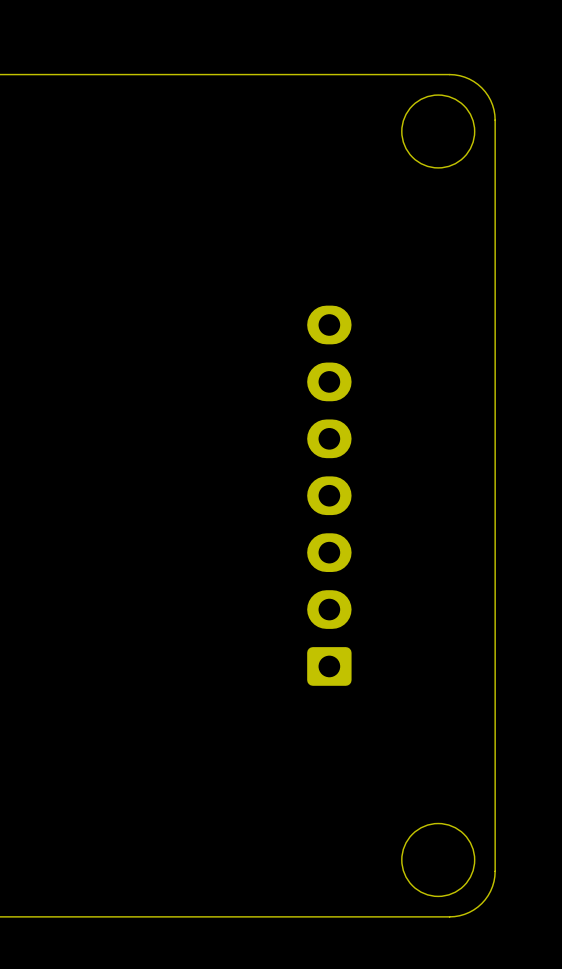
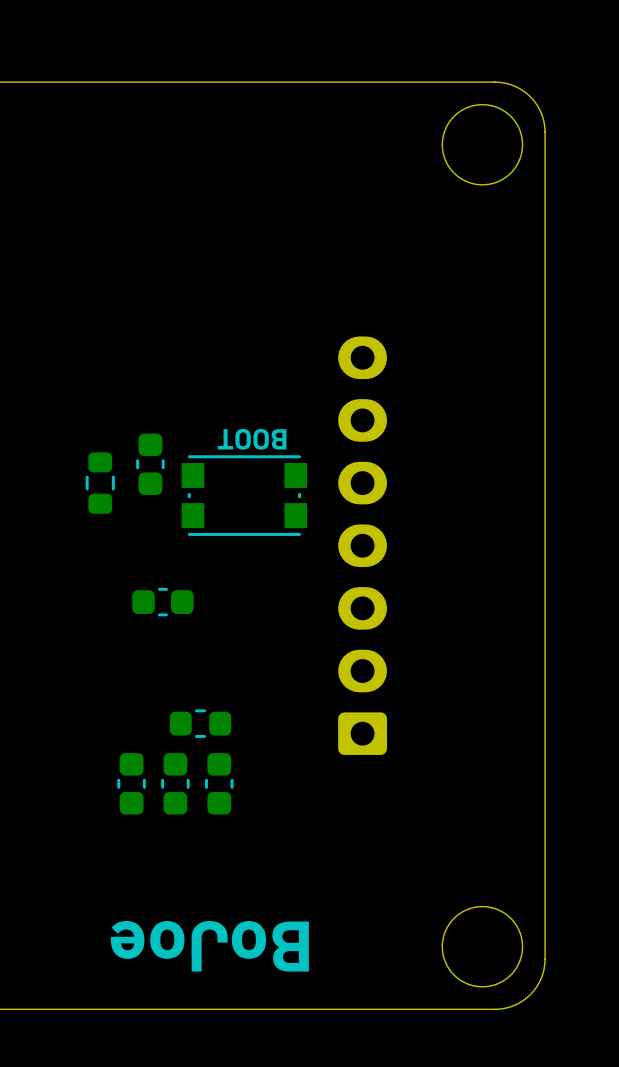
text: none -> BOOT (252, 439)
part: none -> (150, 464)
part: none -> (100, 483)
part: none -> (244, 495)
part: none -> (162, 602)
part: none -> (200, 723)
part: none -> (131, 783)
part: none -> (175, 783)
part: none -> (219, 783)
text: none -> BoJoe (209, 946)

